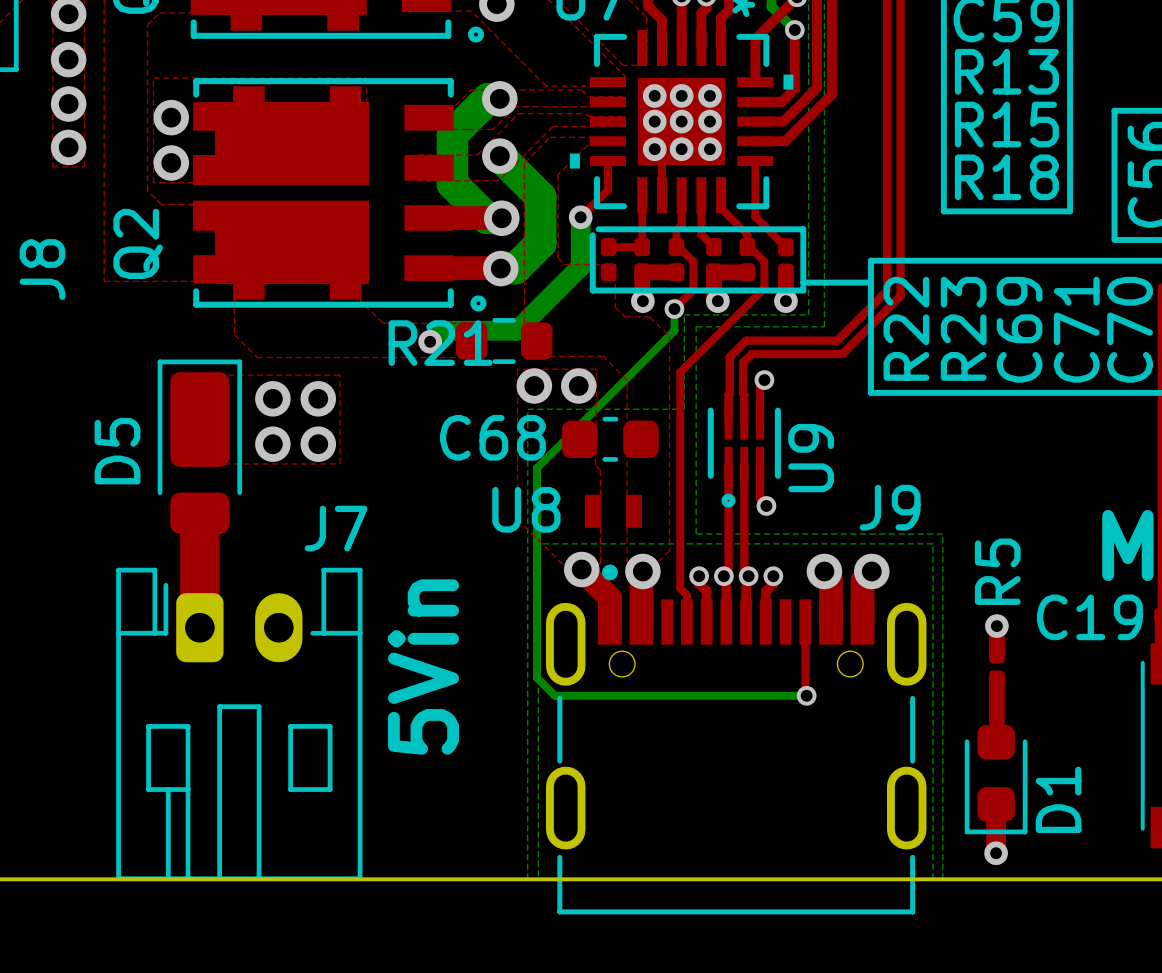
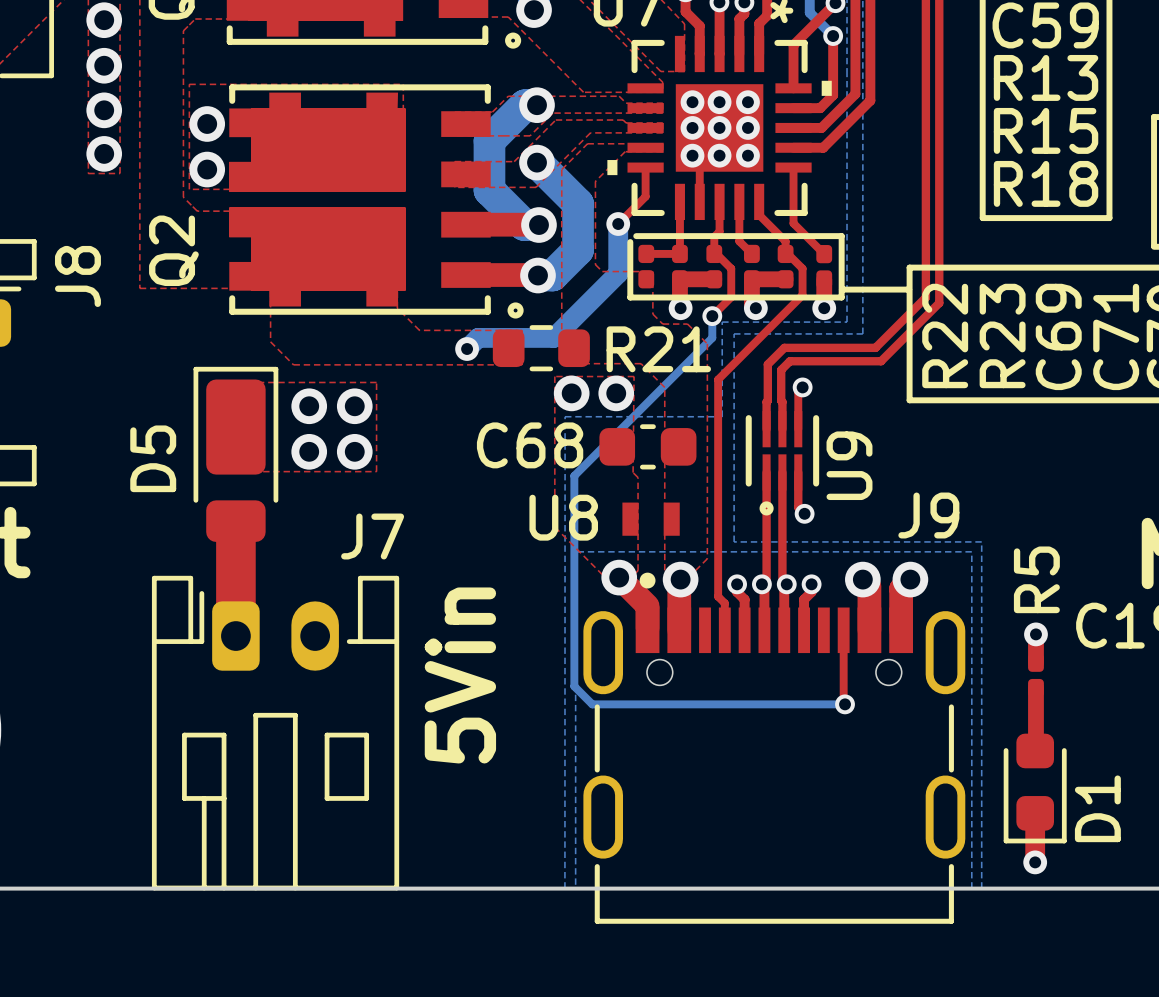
R21 name position: R21 (440, 343) -> R21 (658, 349)

